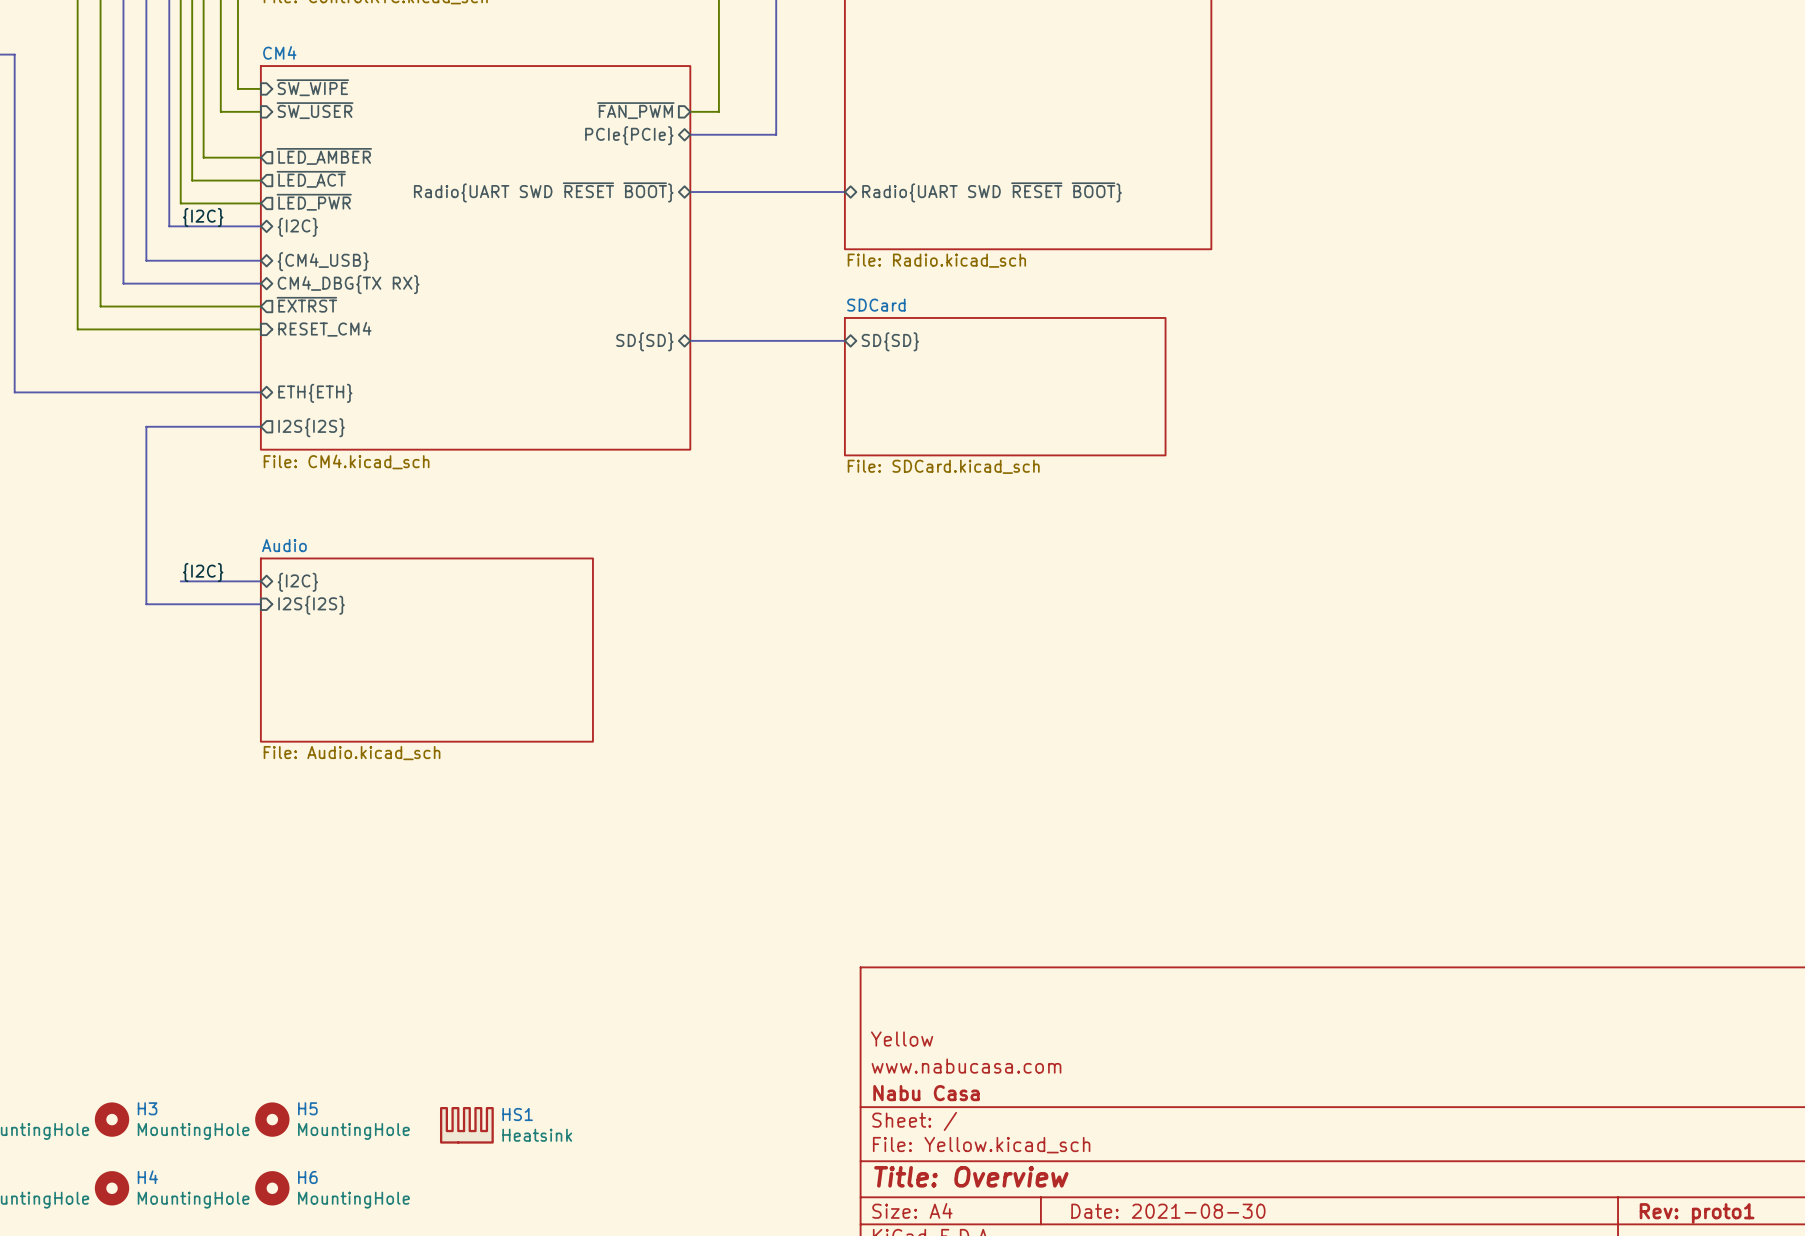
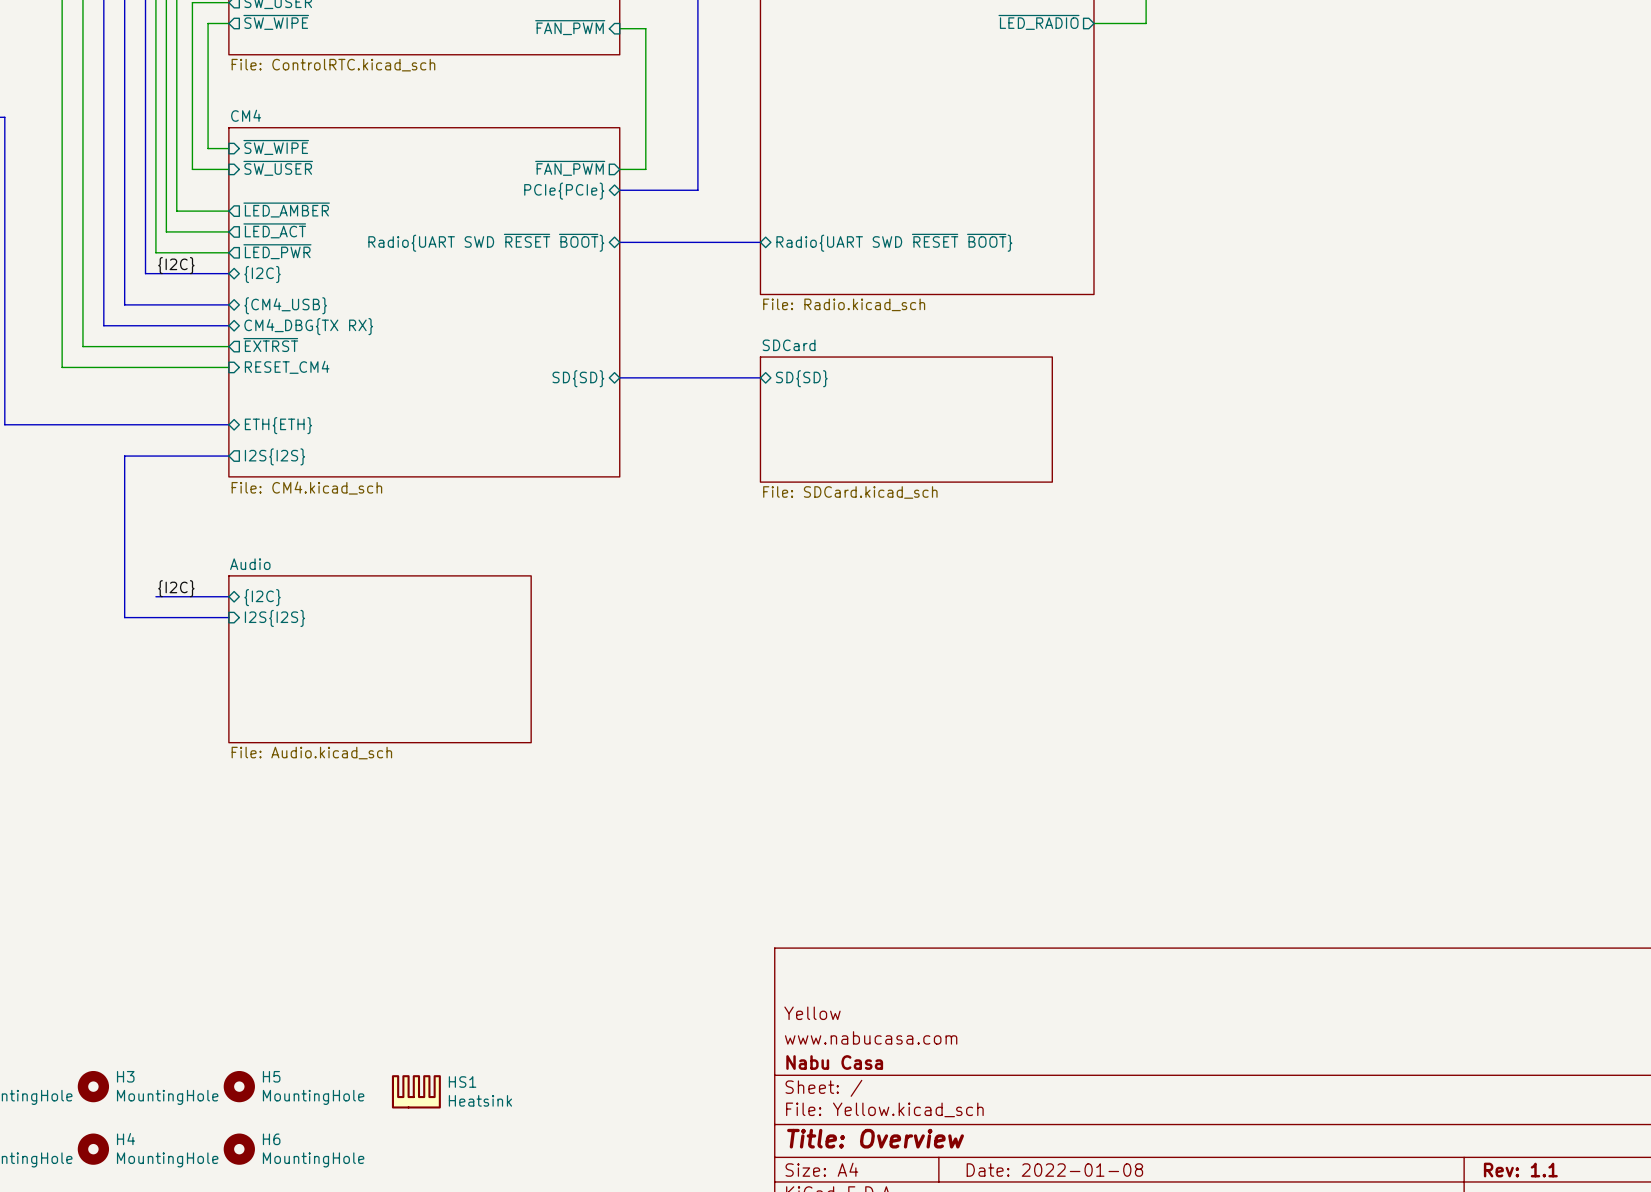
title block: Date: 2021-08-30 (1168, 1211) -> Date: 2022-01-08 (1054, 1170)
title block: Rev: proto1 (1697, 1213) -> Rev: 1.1 (1520, 1170)

